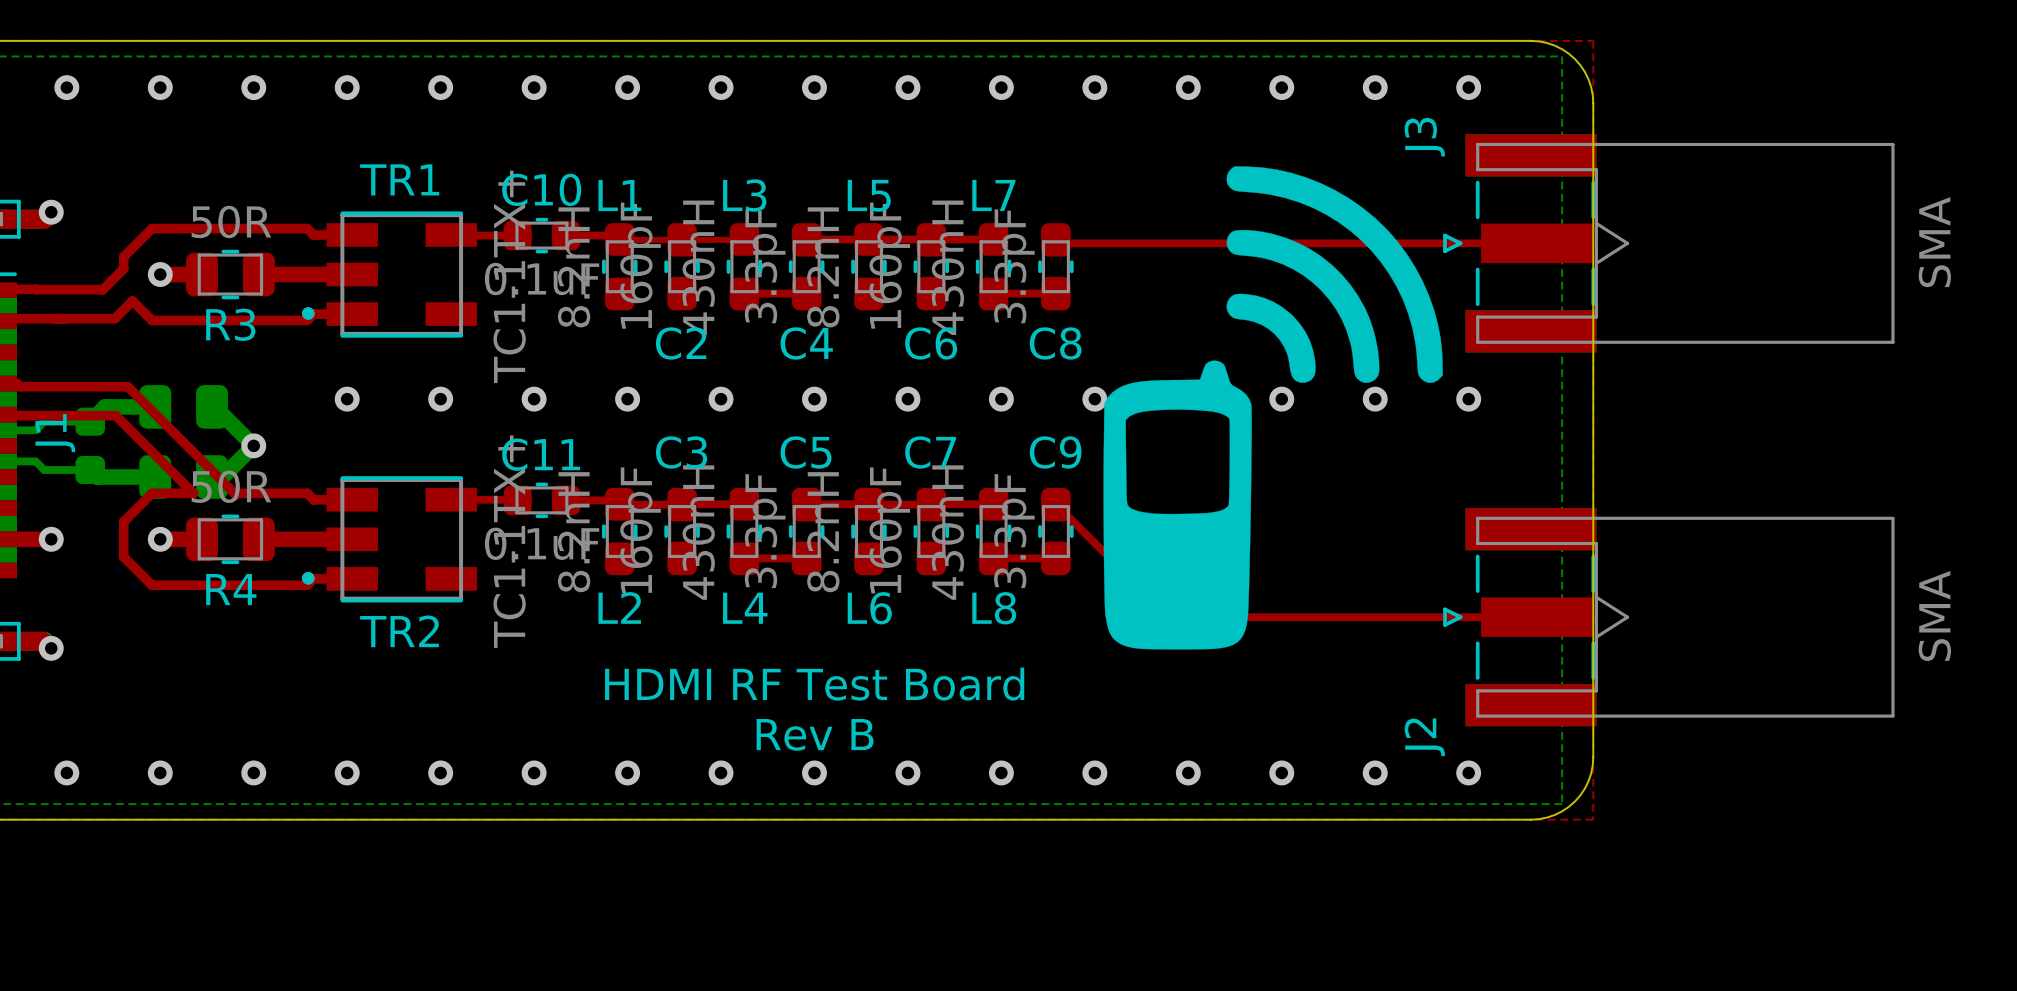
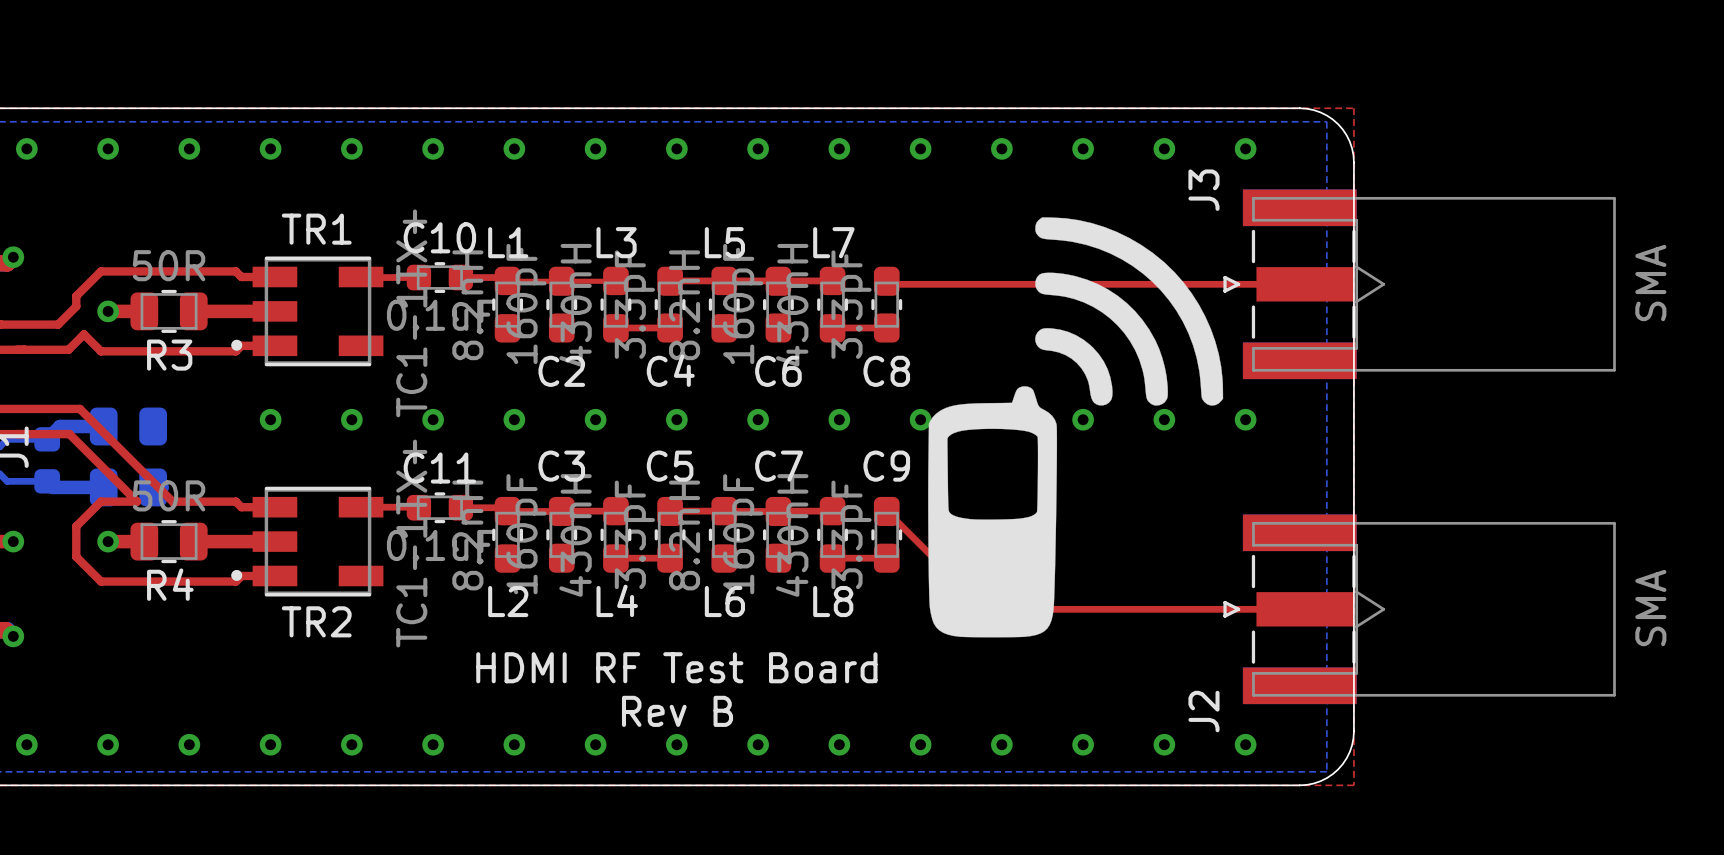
bottom track: (214, 406) (253, 445) (222, 477) -> none
via: (253, 445) -> none

